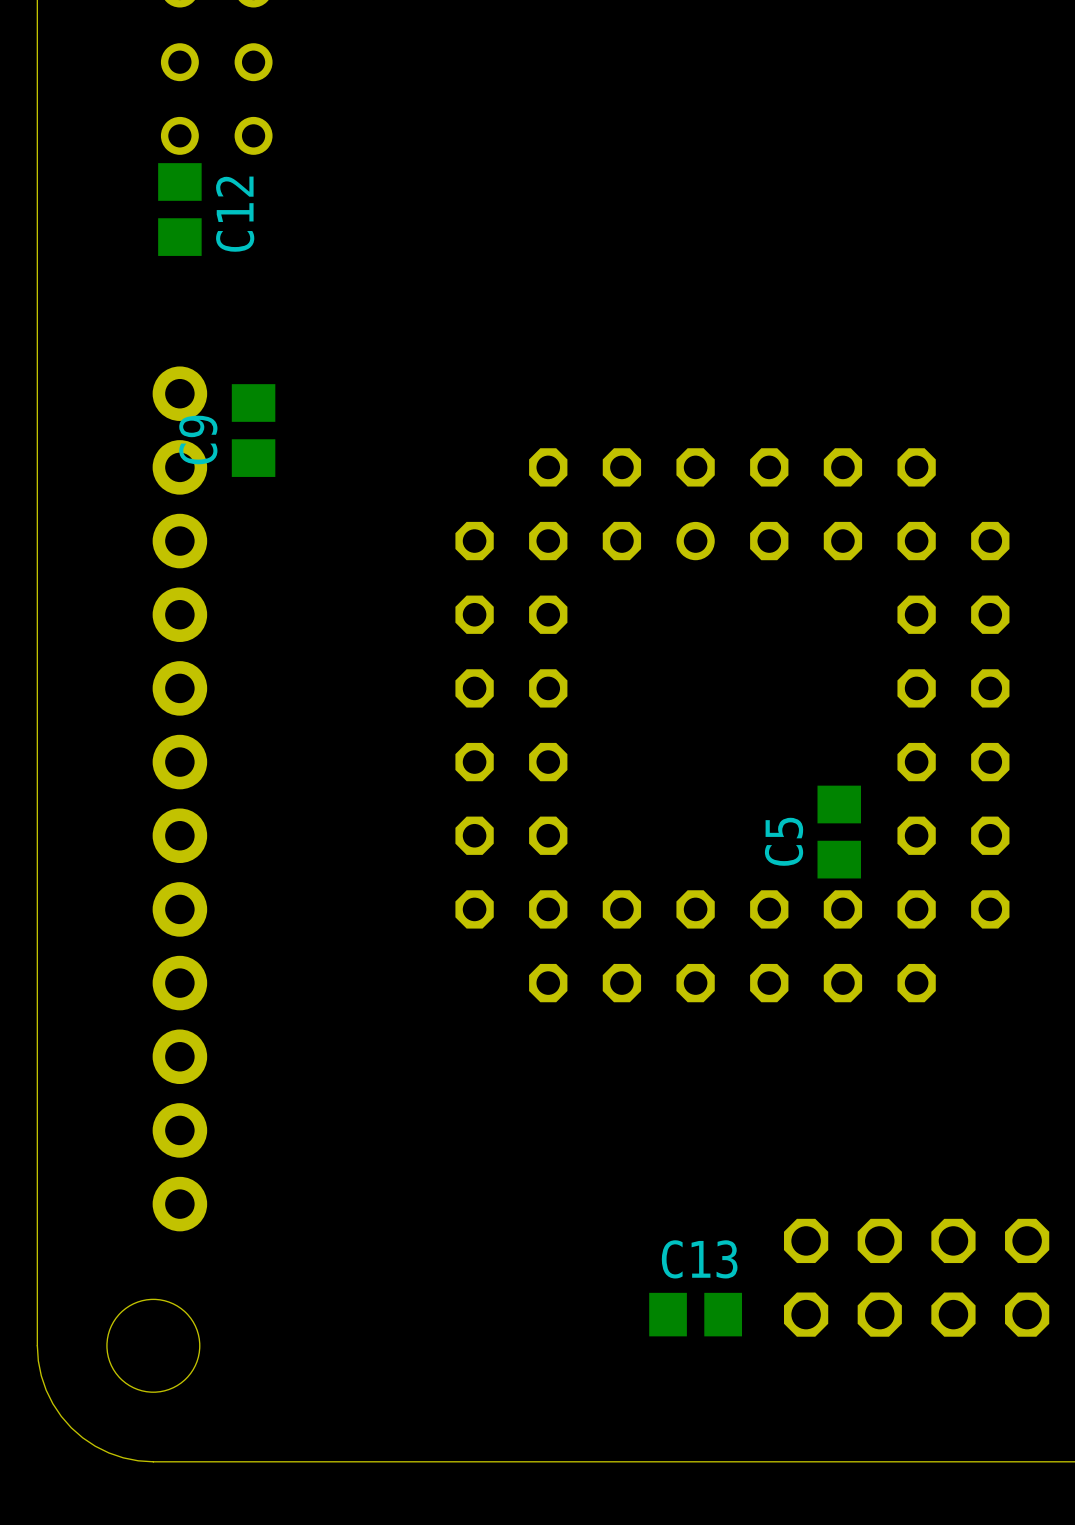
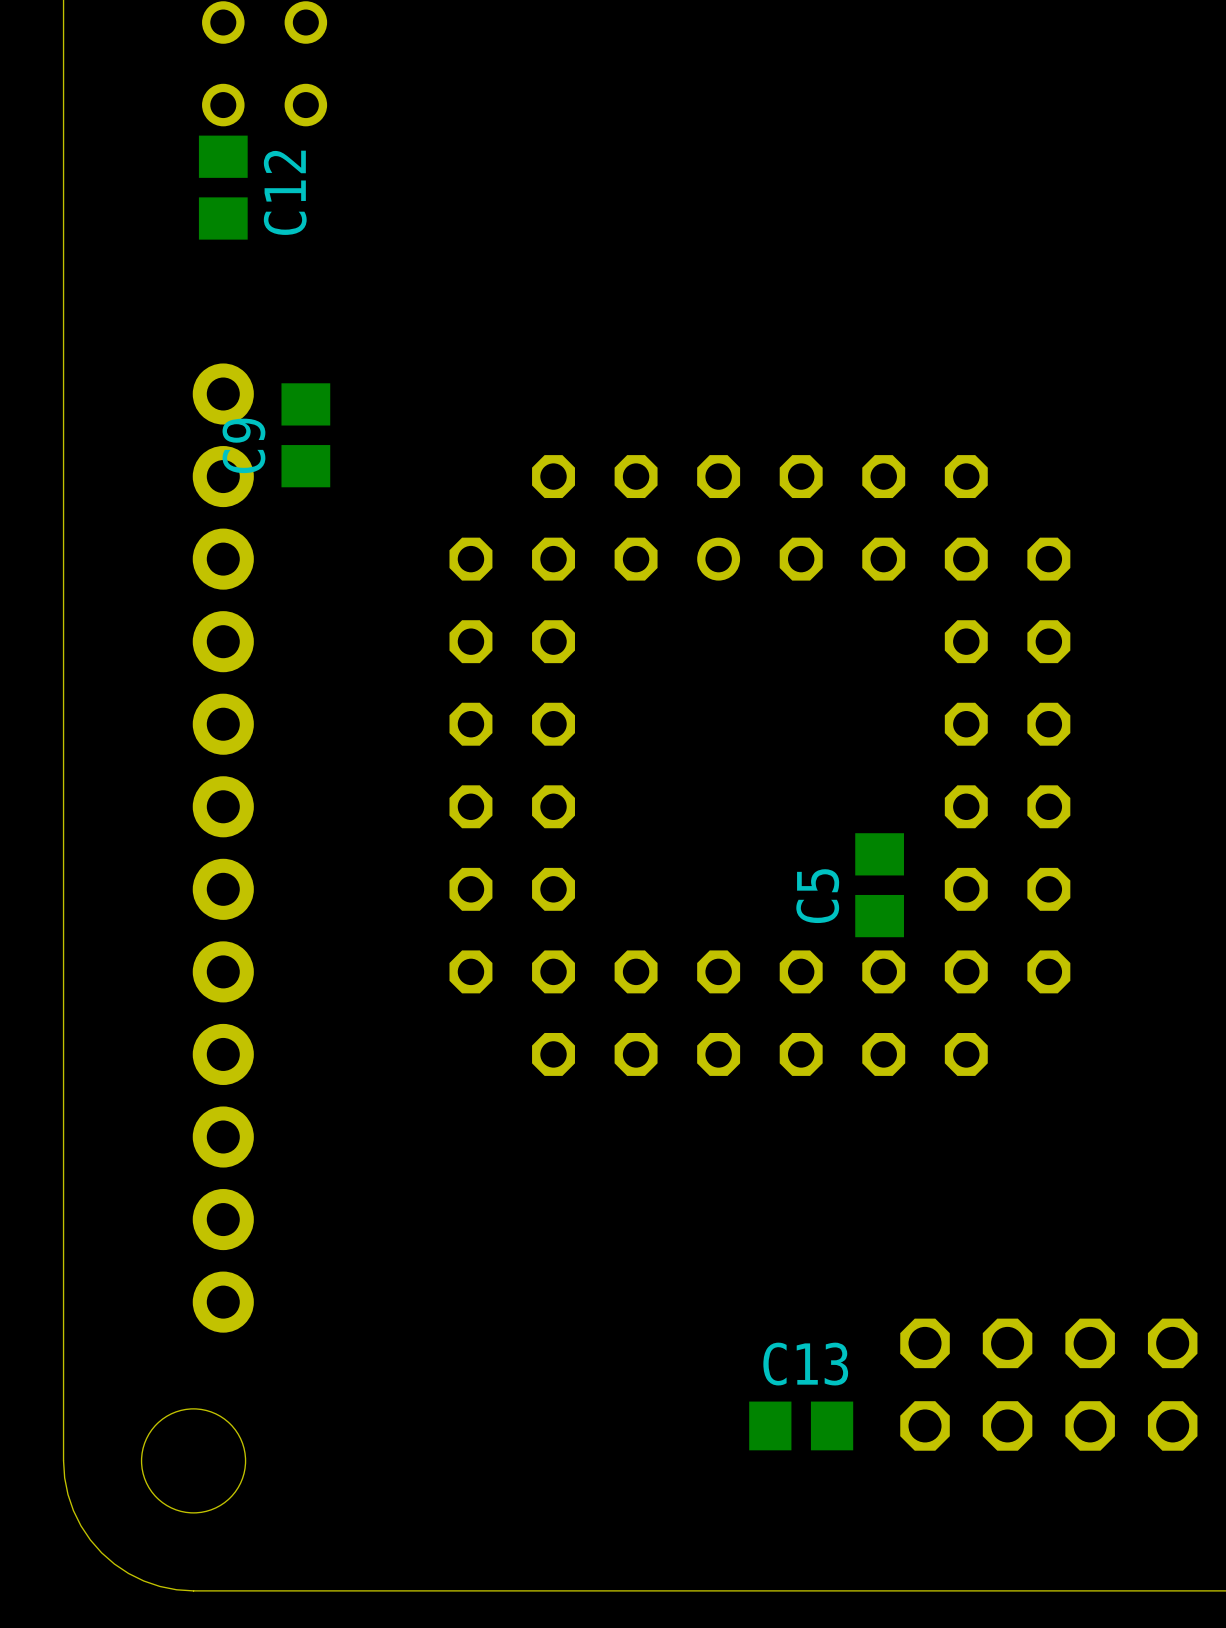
part position: (732, 725) -> (759, 765)
C5 position: (839, 832) -> (879, 885)

